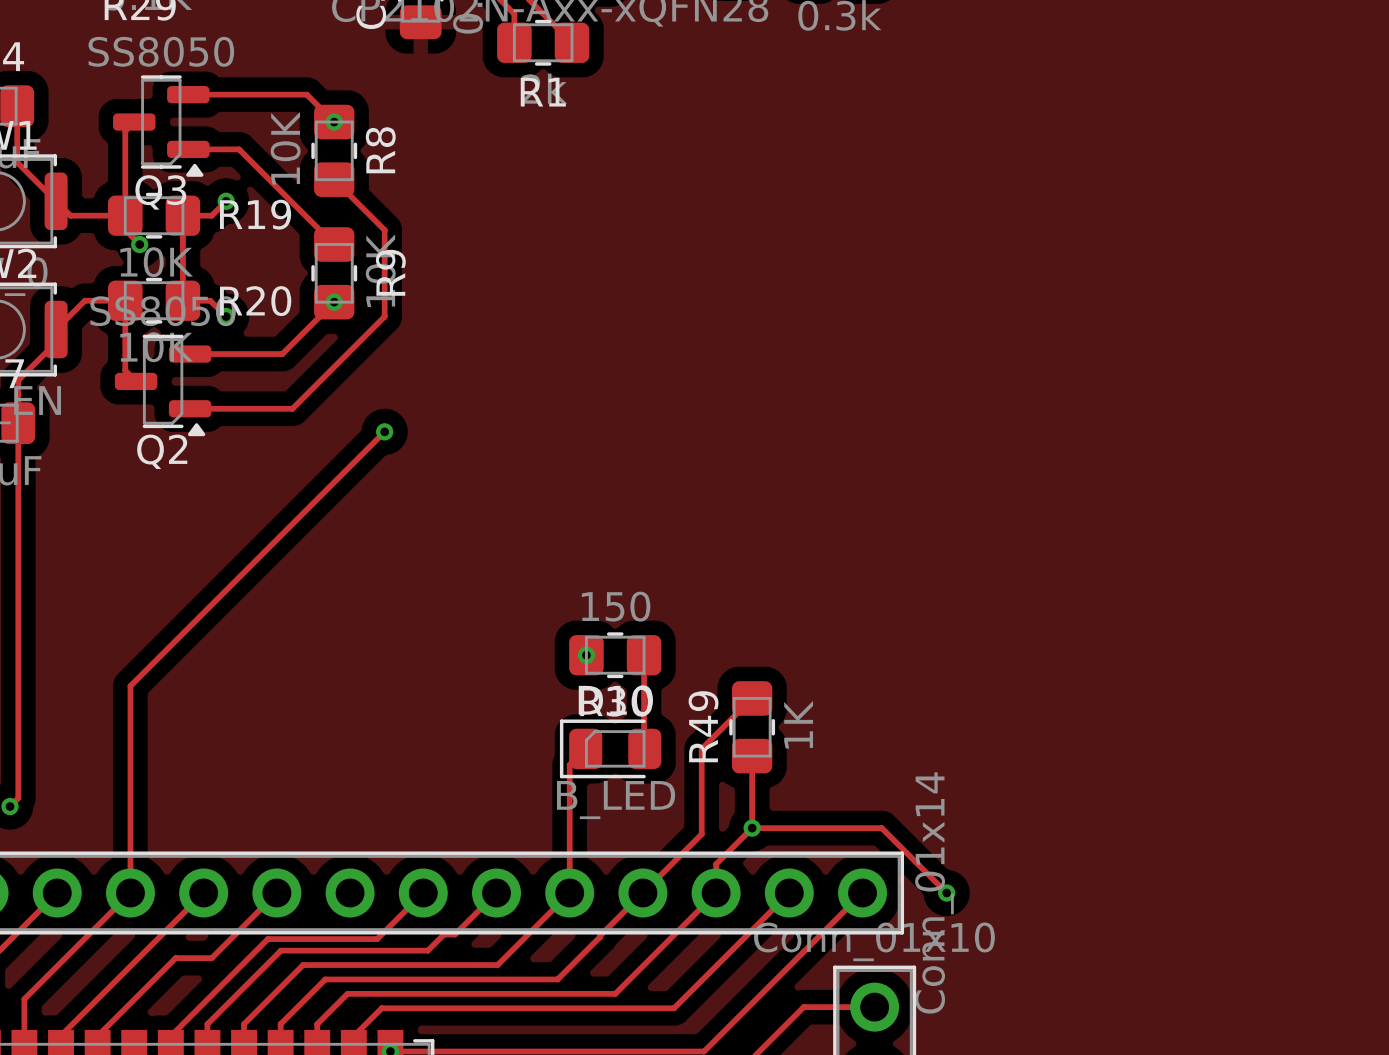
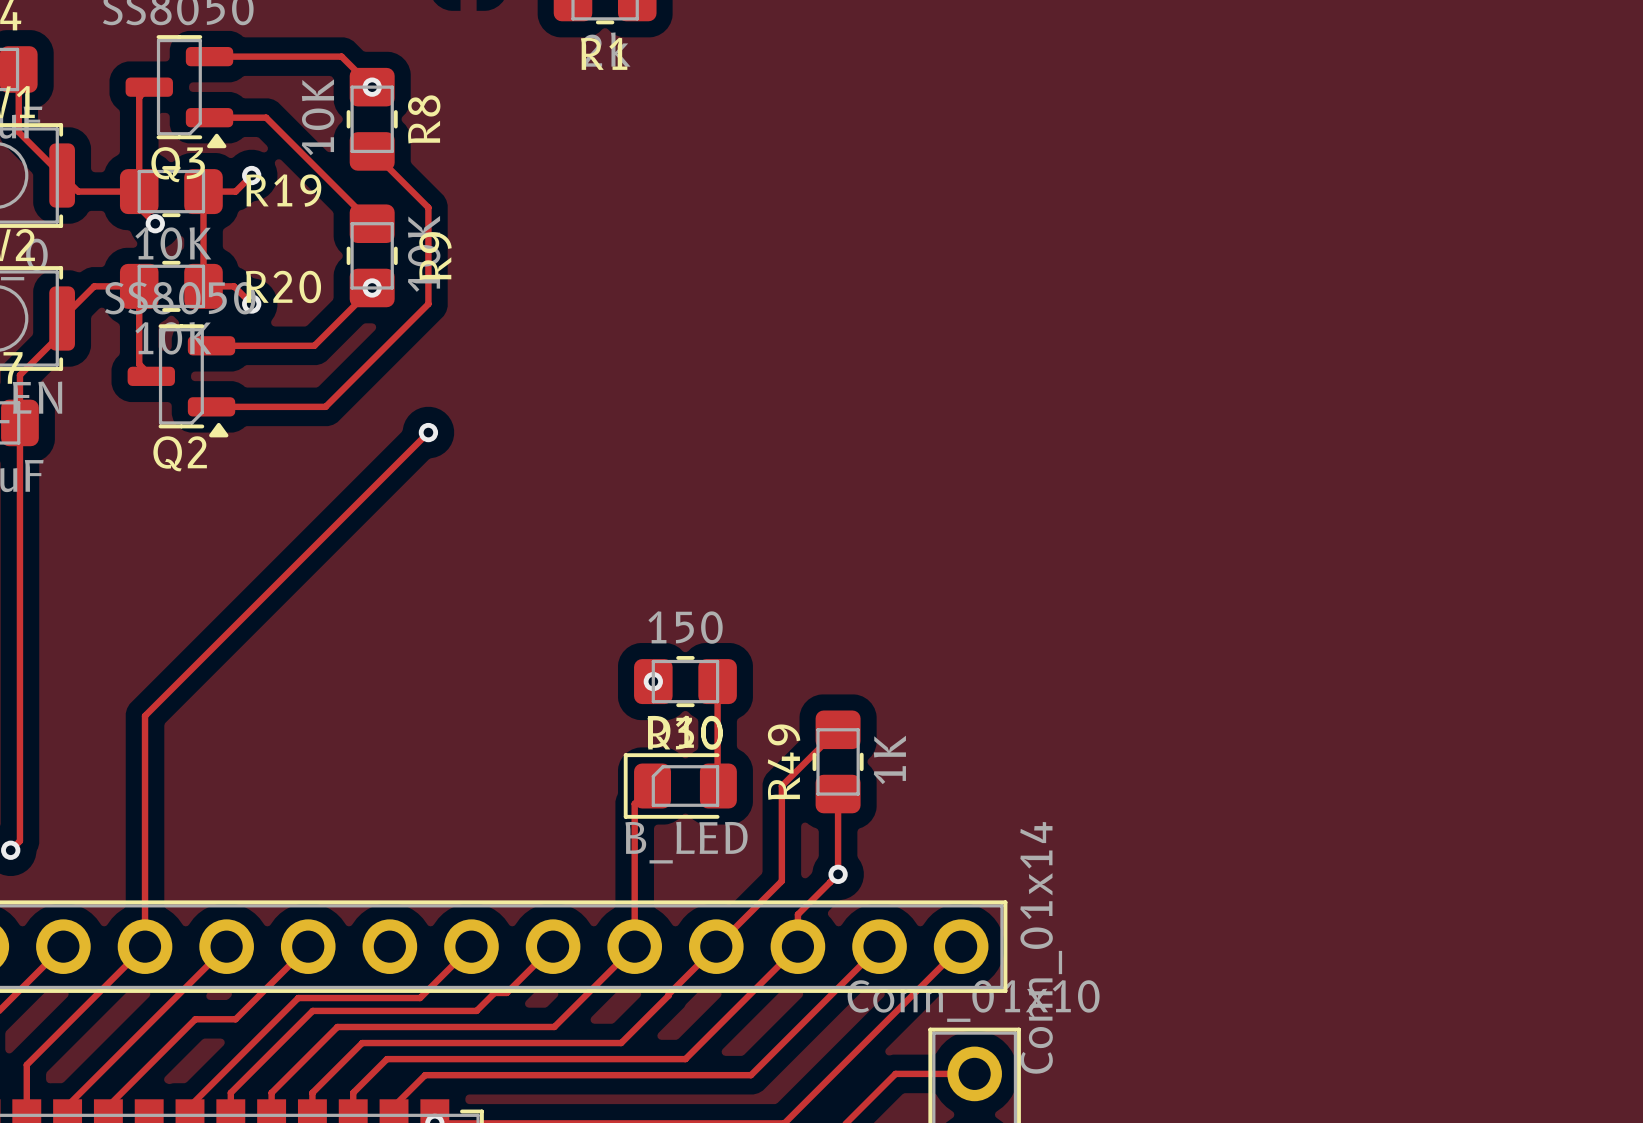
track: (752, 828) (881, 828) (946, 893) -> none
via: (946, 893) -> none

